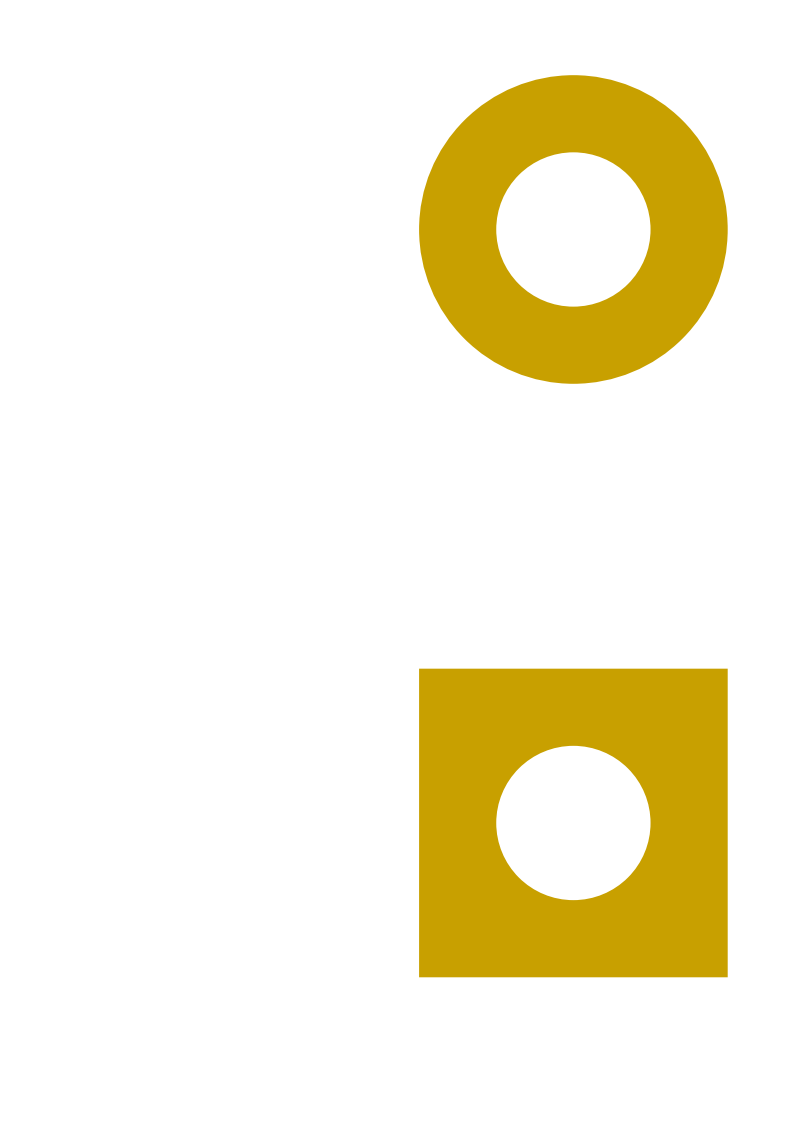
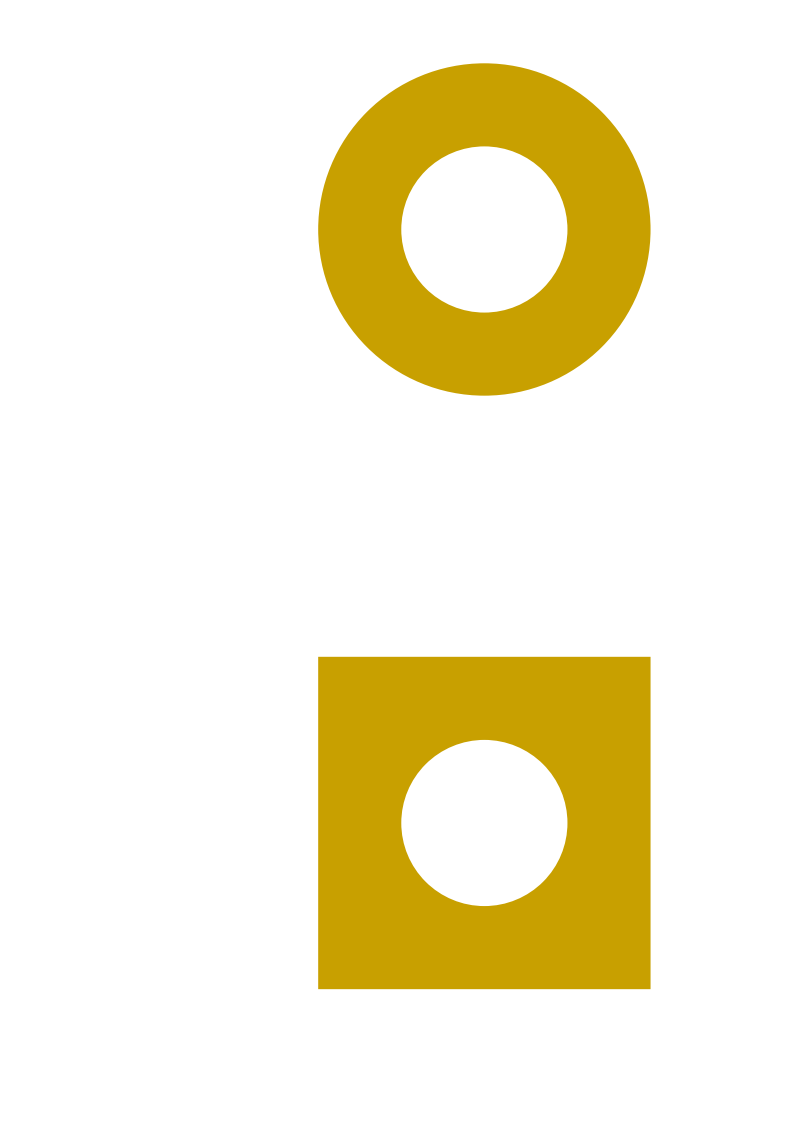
part footprint: [419, 75, 728, 978] -> [318, 63, 651, 990]

